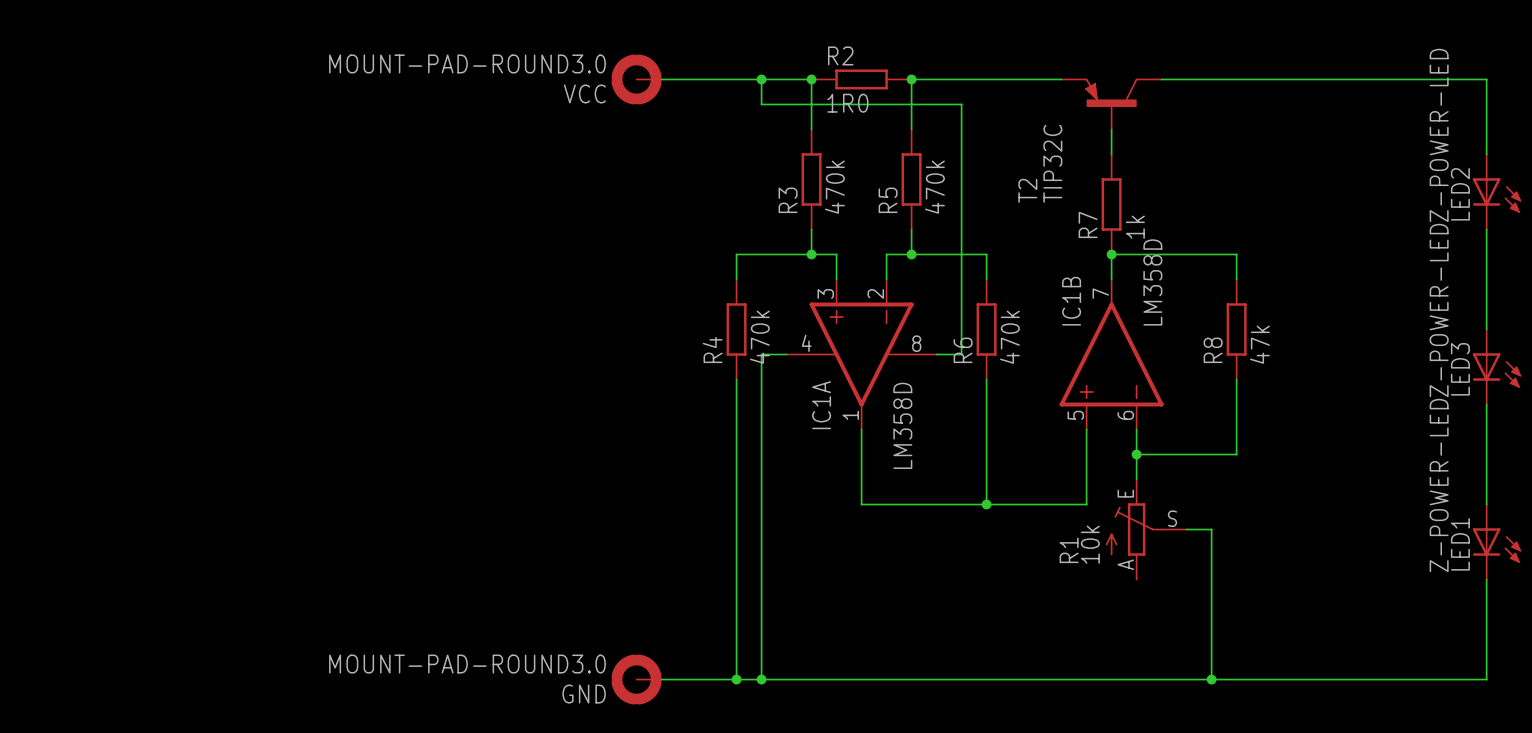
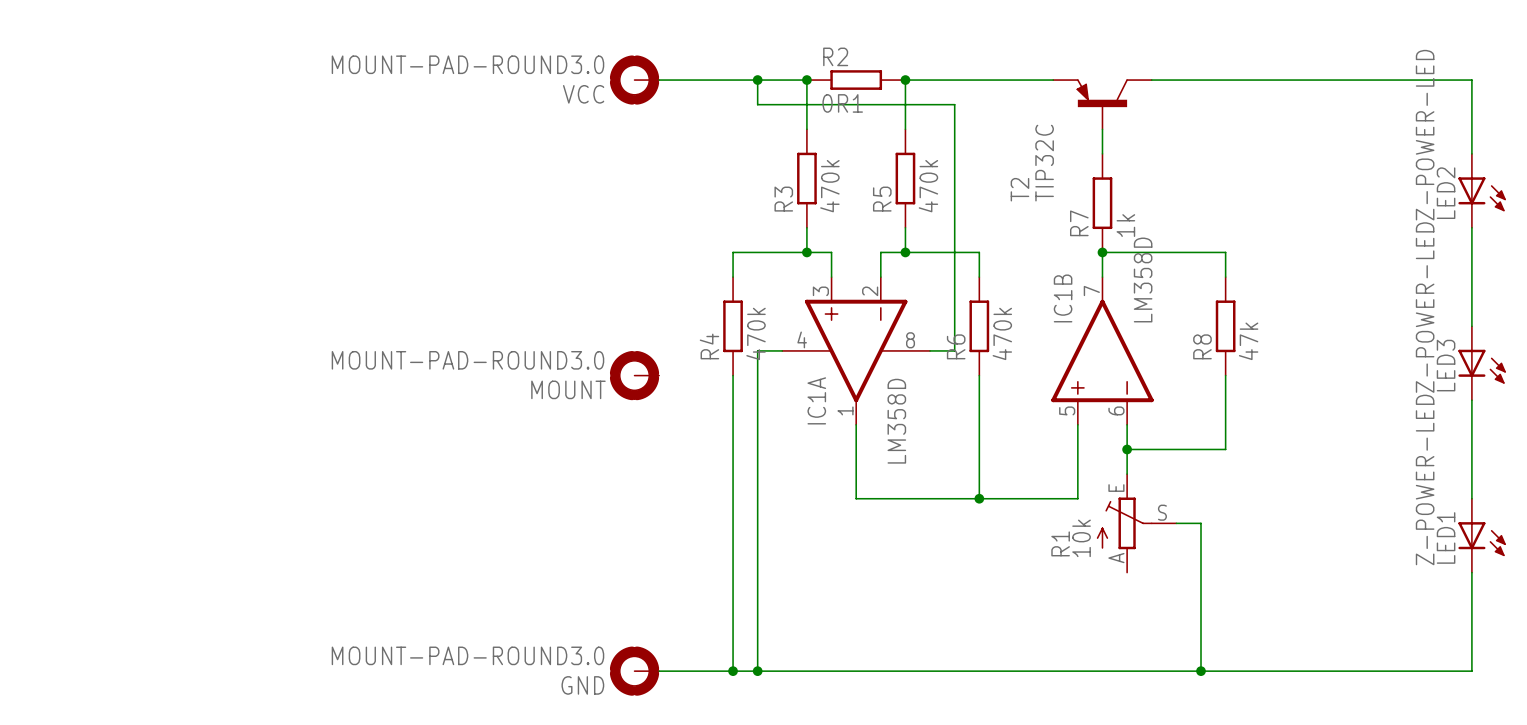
R2 value: 1R0 (847, 103) -> 0R1 (842, 103)
MOUNT: none -> MOUNT-PAD-ROUND3.0 (634, 375)

